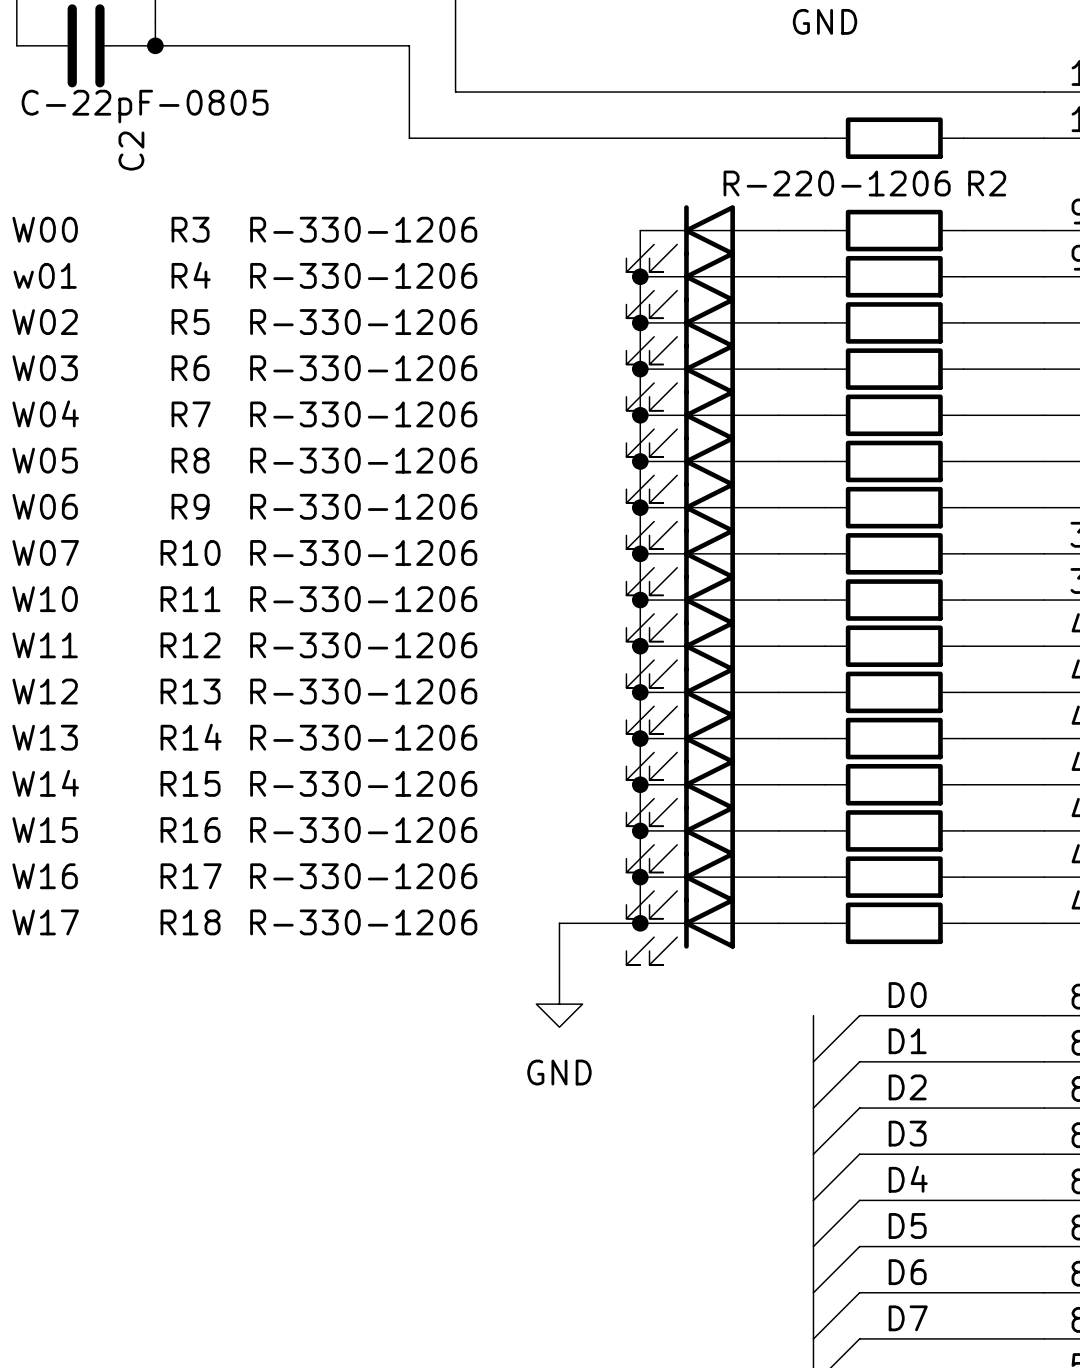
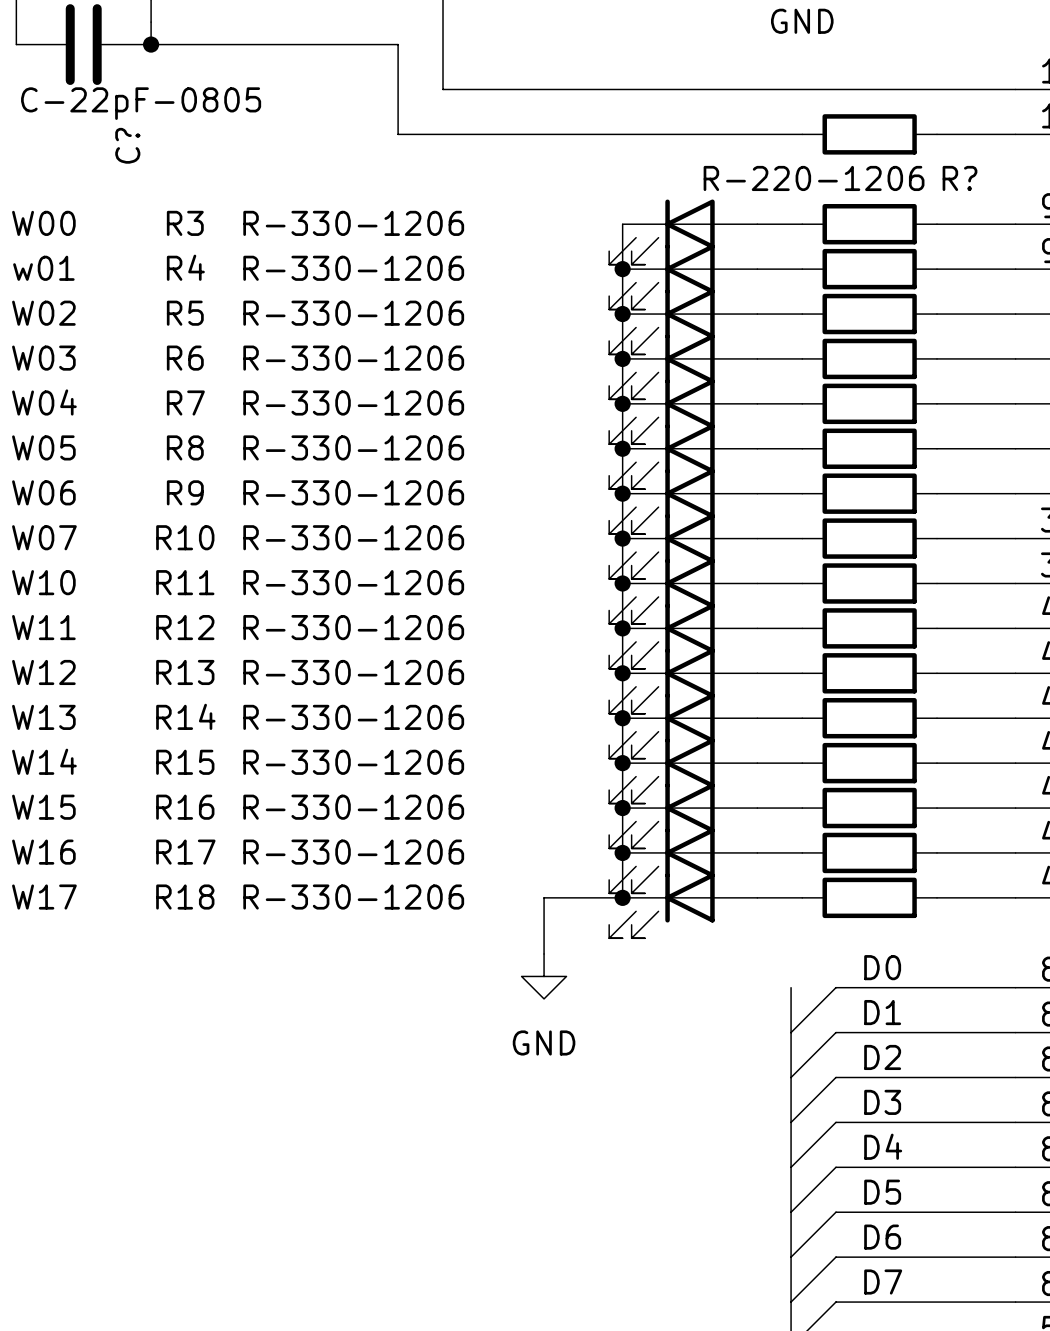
C2 name: C2 (131, 151) -> C? (127, 145)
R2 name: R2 (987, 183) -> R? (960, 178)

